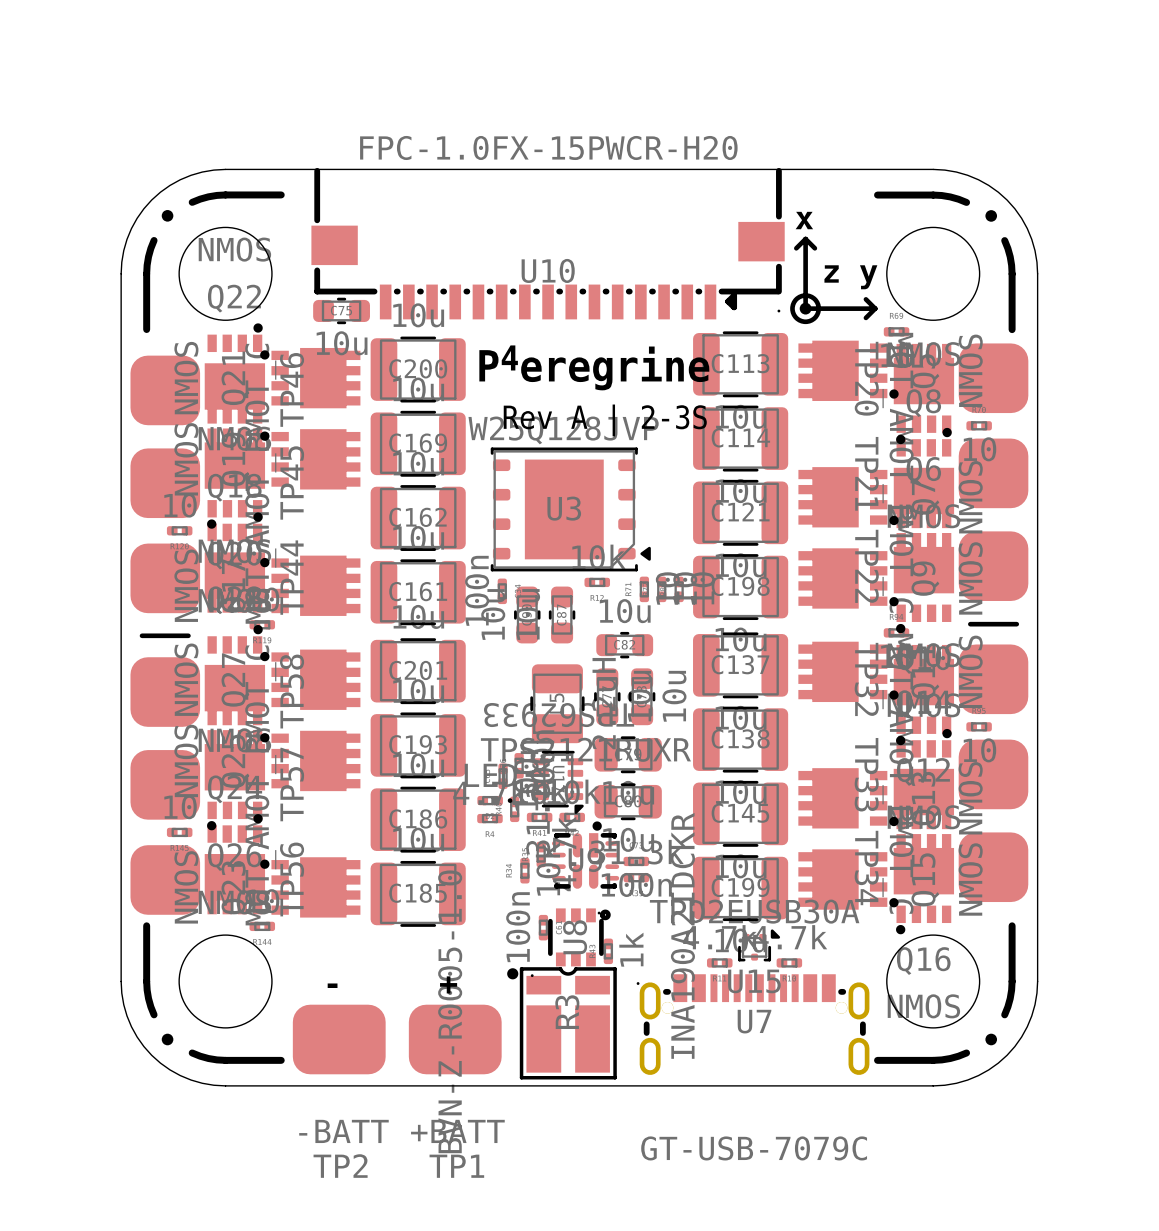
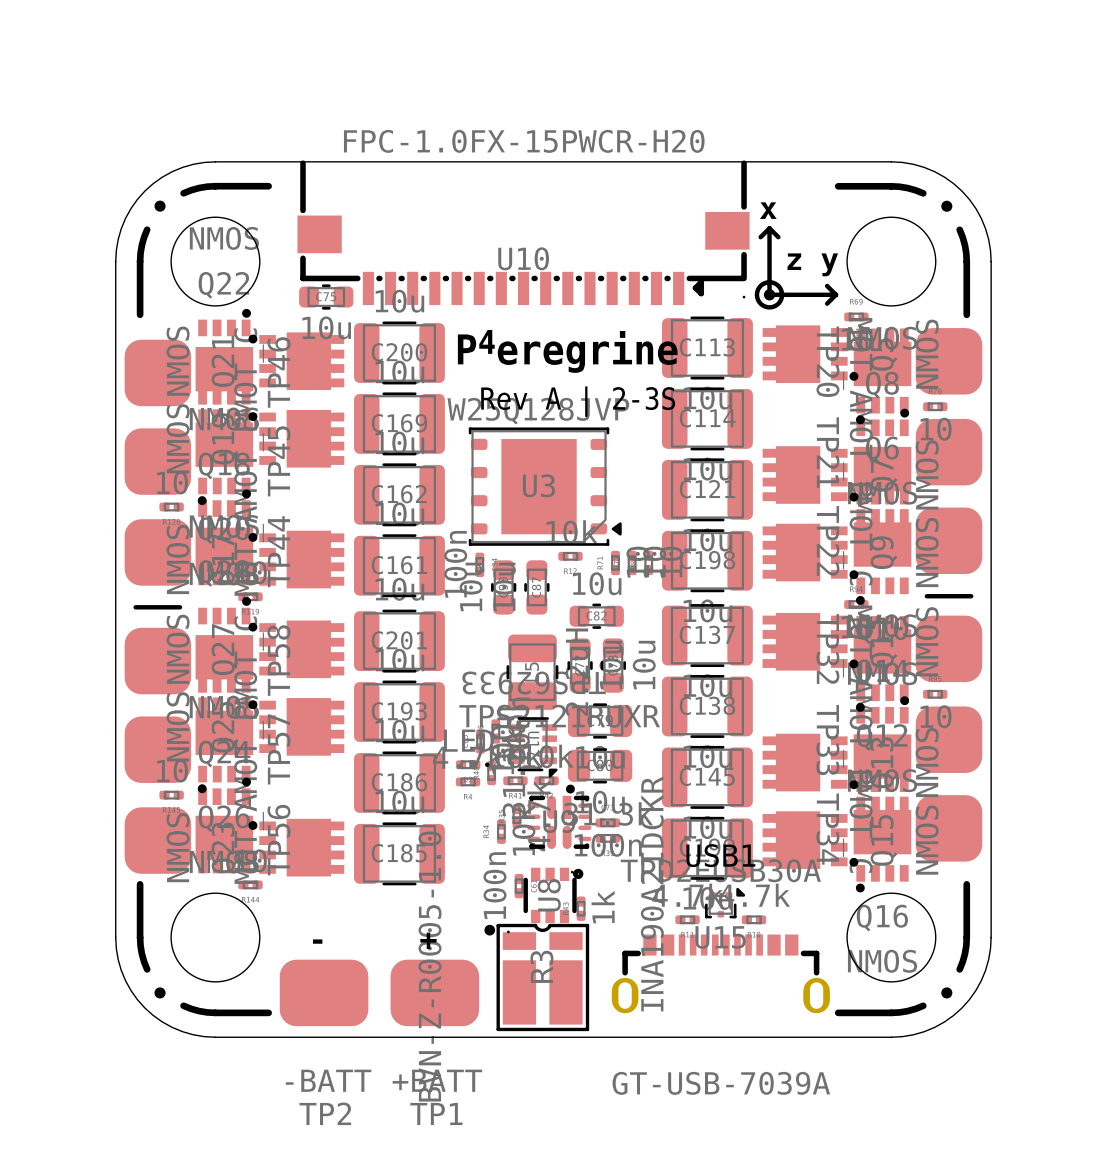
USB1: none -> GT-USB-7039A (720, 973)
U7: GT-USB-7079C (753, 1024) -> none

